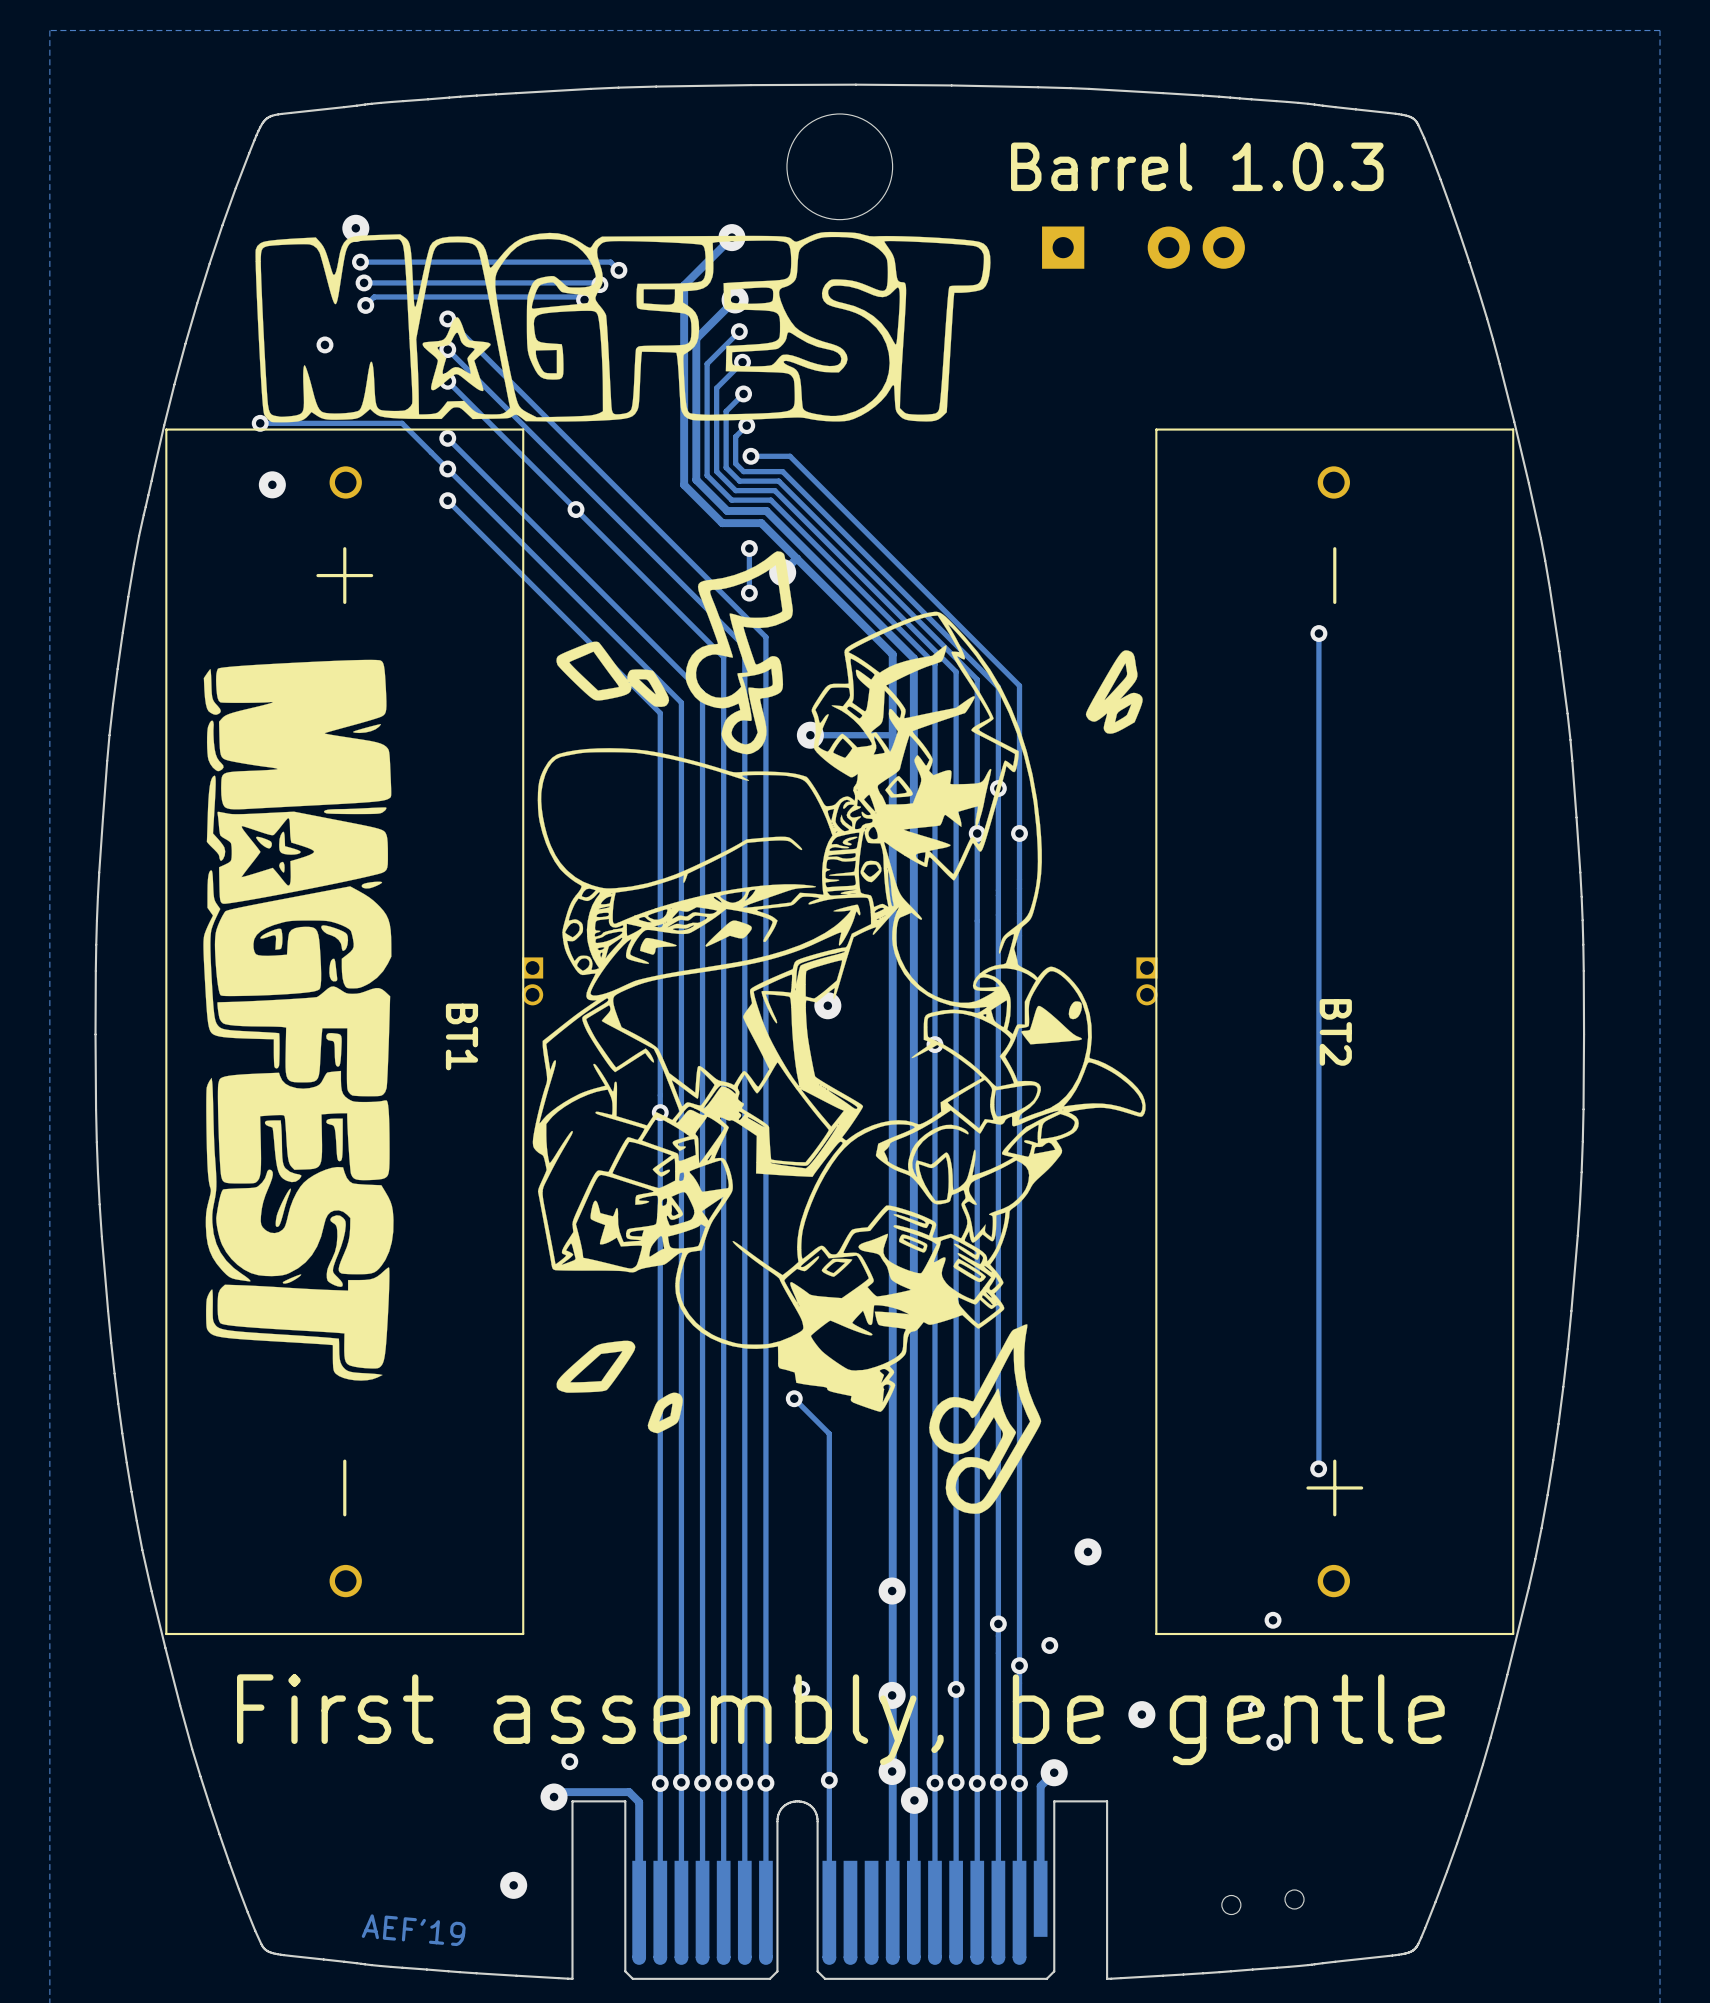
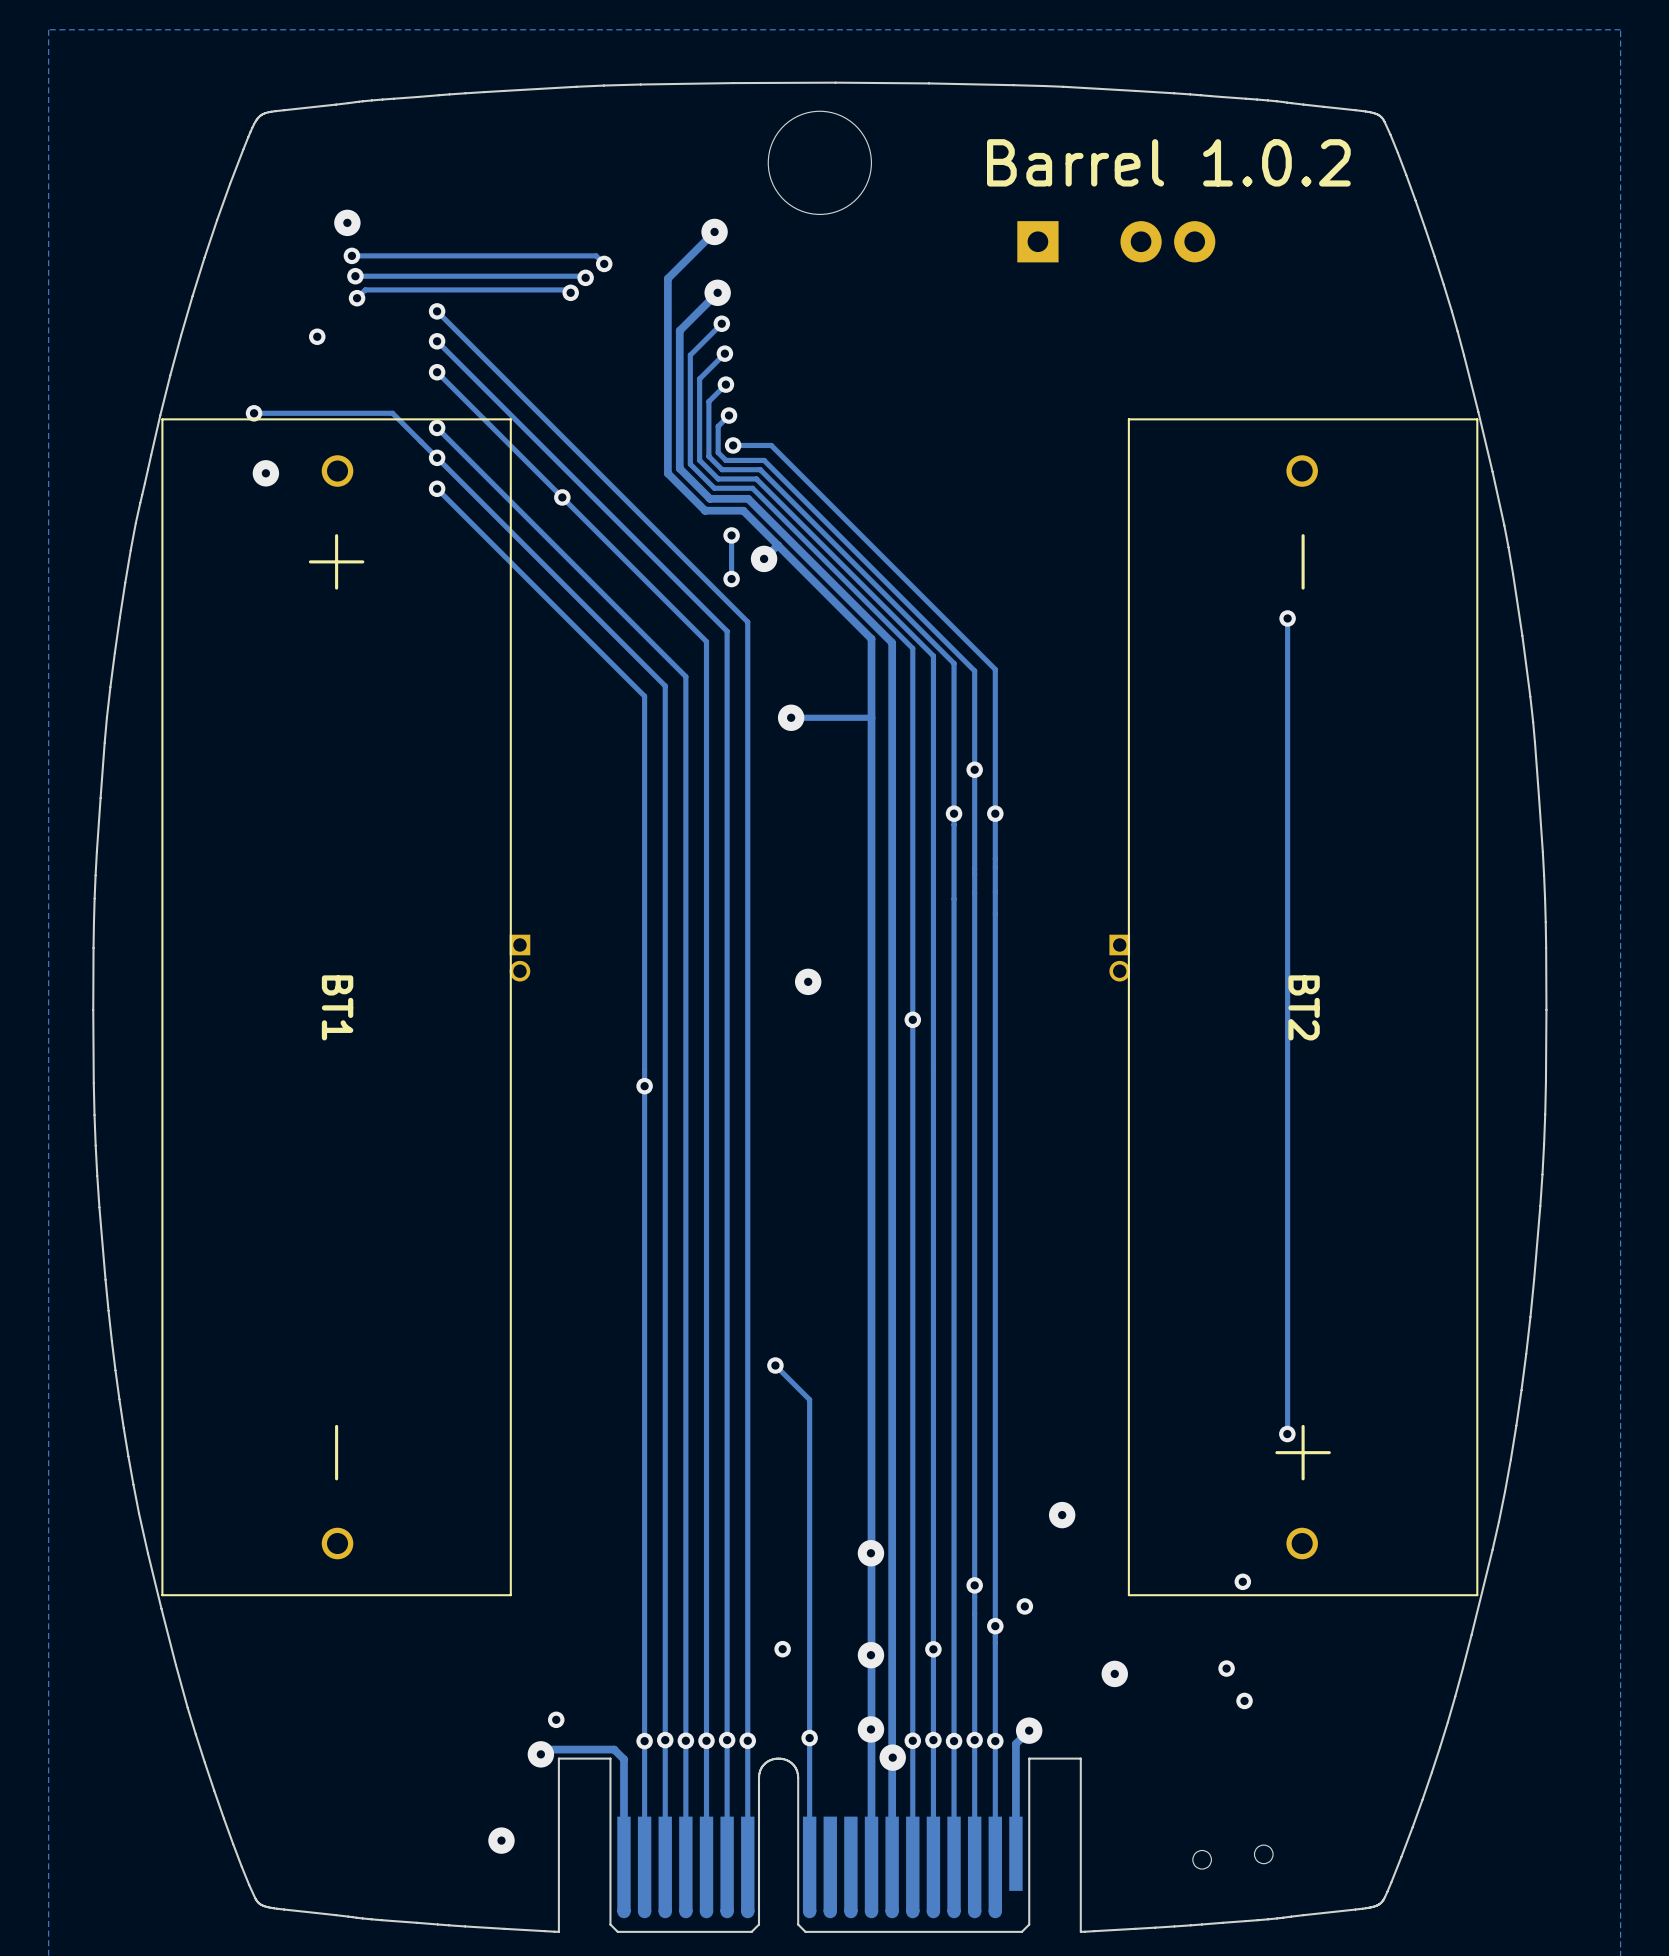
text: Barrel 1.0.3 (1197, 166) -> Barrel 1.0.2 (1168, 162)
drawing: [255, 231, 991, 423] -> none
drawing: [532, 551, 1146, 1514] -> none
drawing: [203, 659, 394, 1381] -> none
BT1 name position: BT1 (461, 1036) -> BT1 (337, 1007)
text: First assembly, be gentle (840, 1719) -> none
text: AEF'19 (413, 1930) -> none

